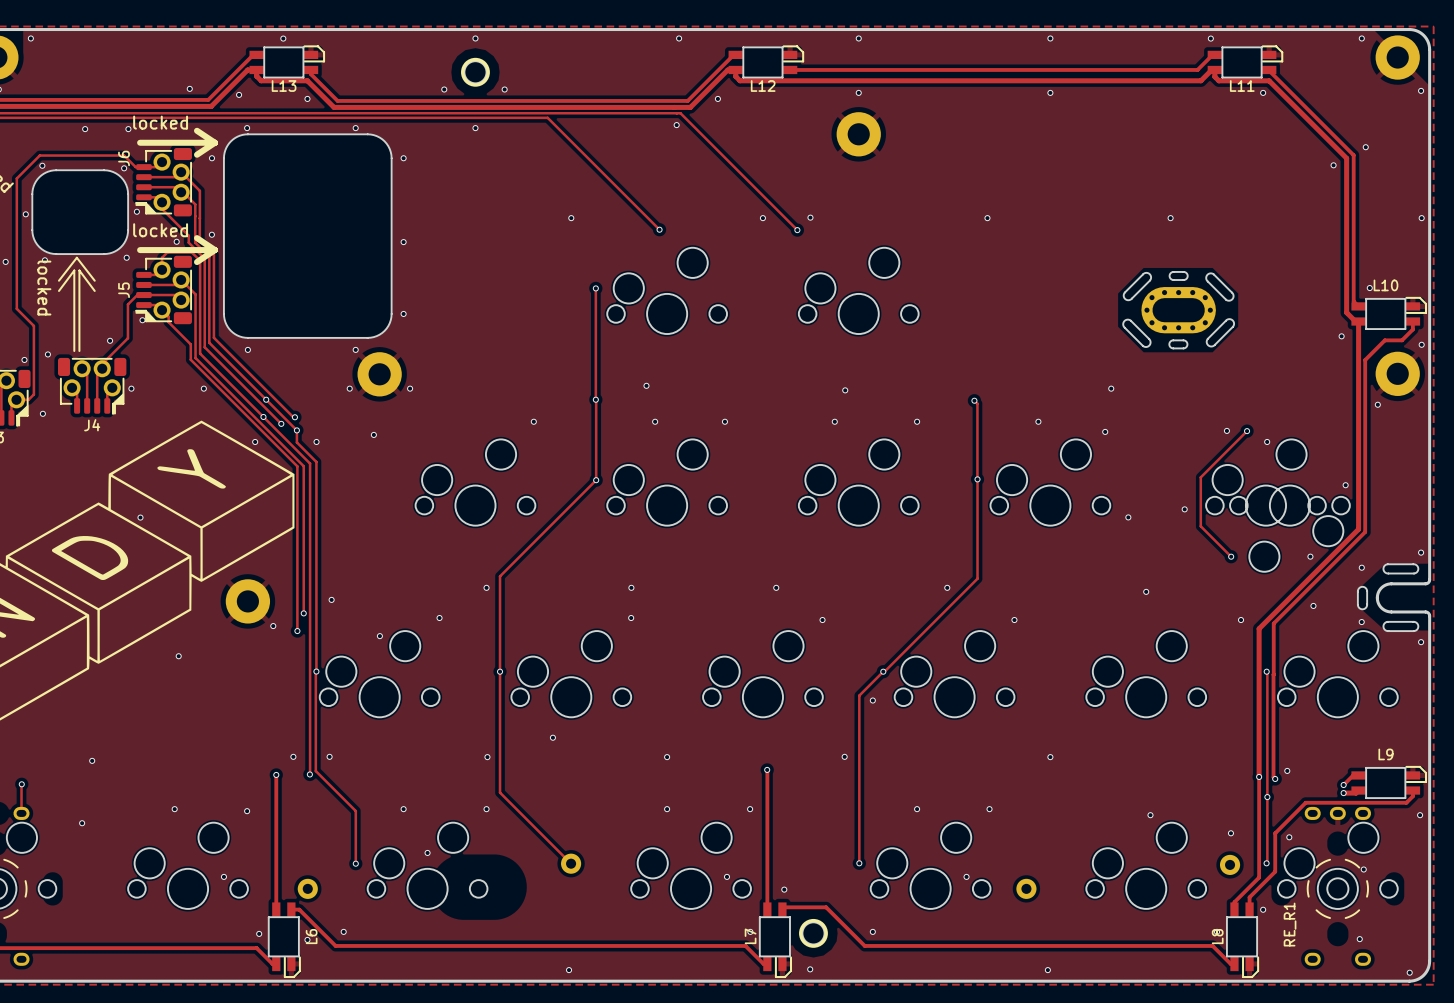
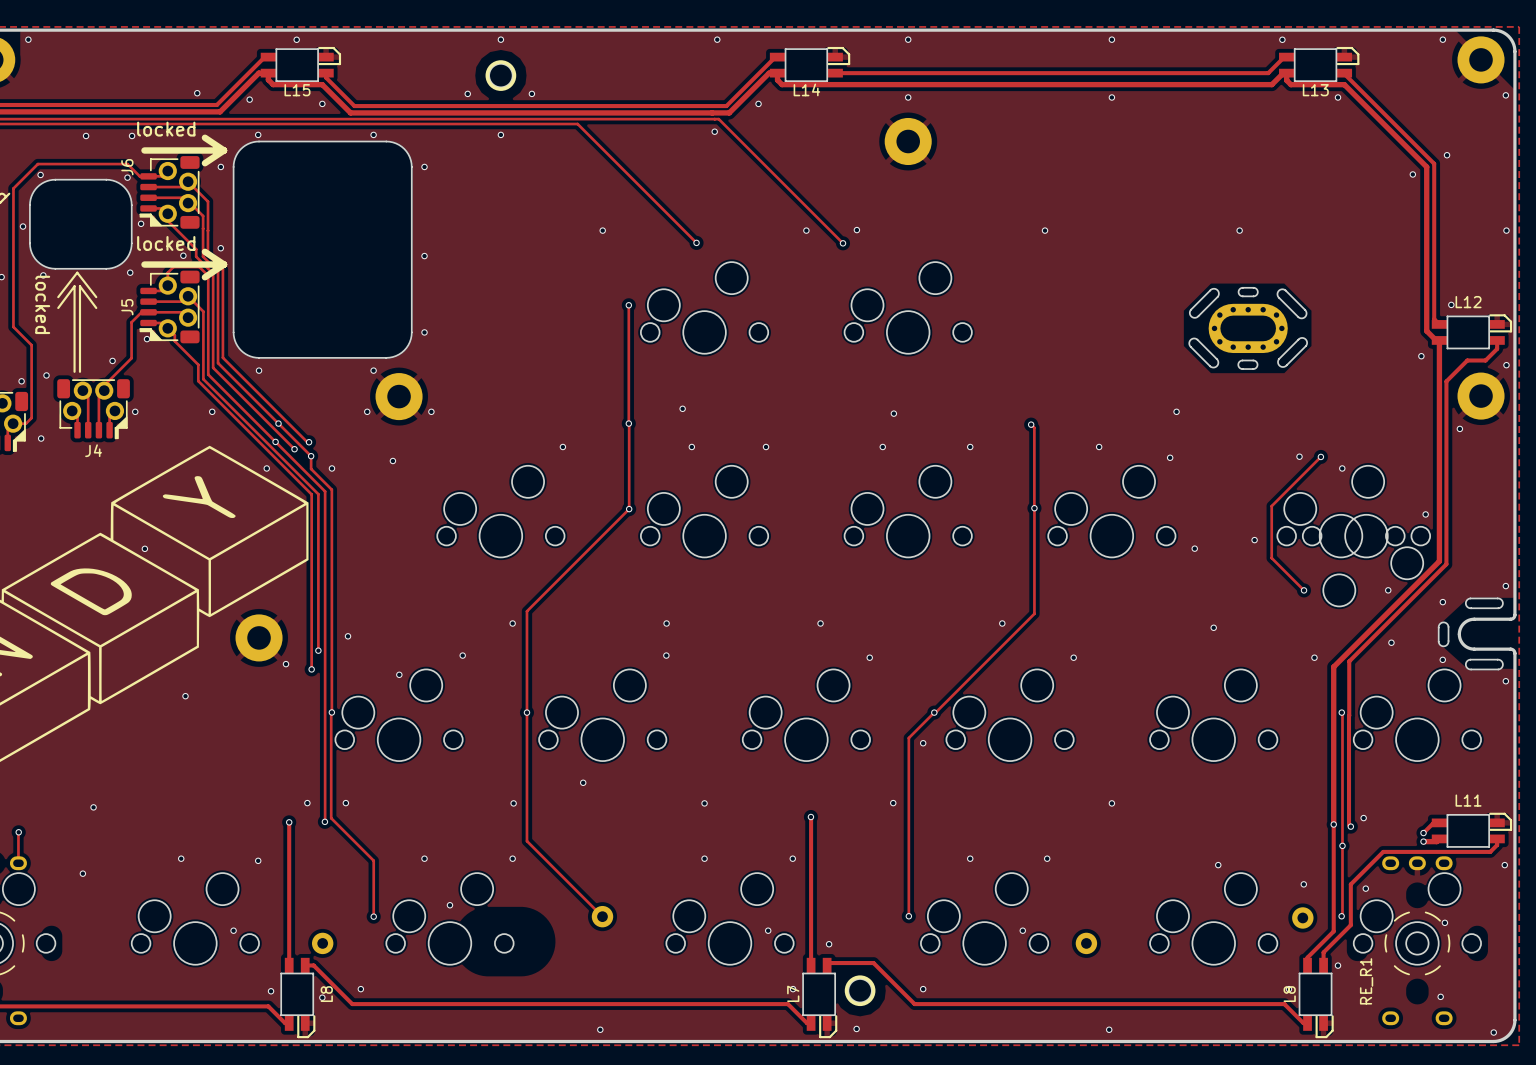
L13 name: L13 (284, 86) -> L15 (297, 90)
L12 name: L12 (763, 86) -> L14 (806, 89)
L11 name: L11 (1242, 86) -> L13 (1315, 90)
L10 name: L10 (1385, 285) -> L12 (1468, 302)
L9 name: L9 (1385, 754) -> L11 (1468, 800)
L6 name: L6 (311, 936) -> L8 (326, 994)

